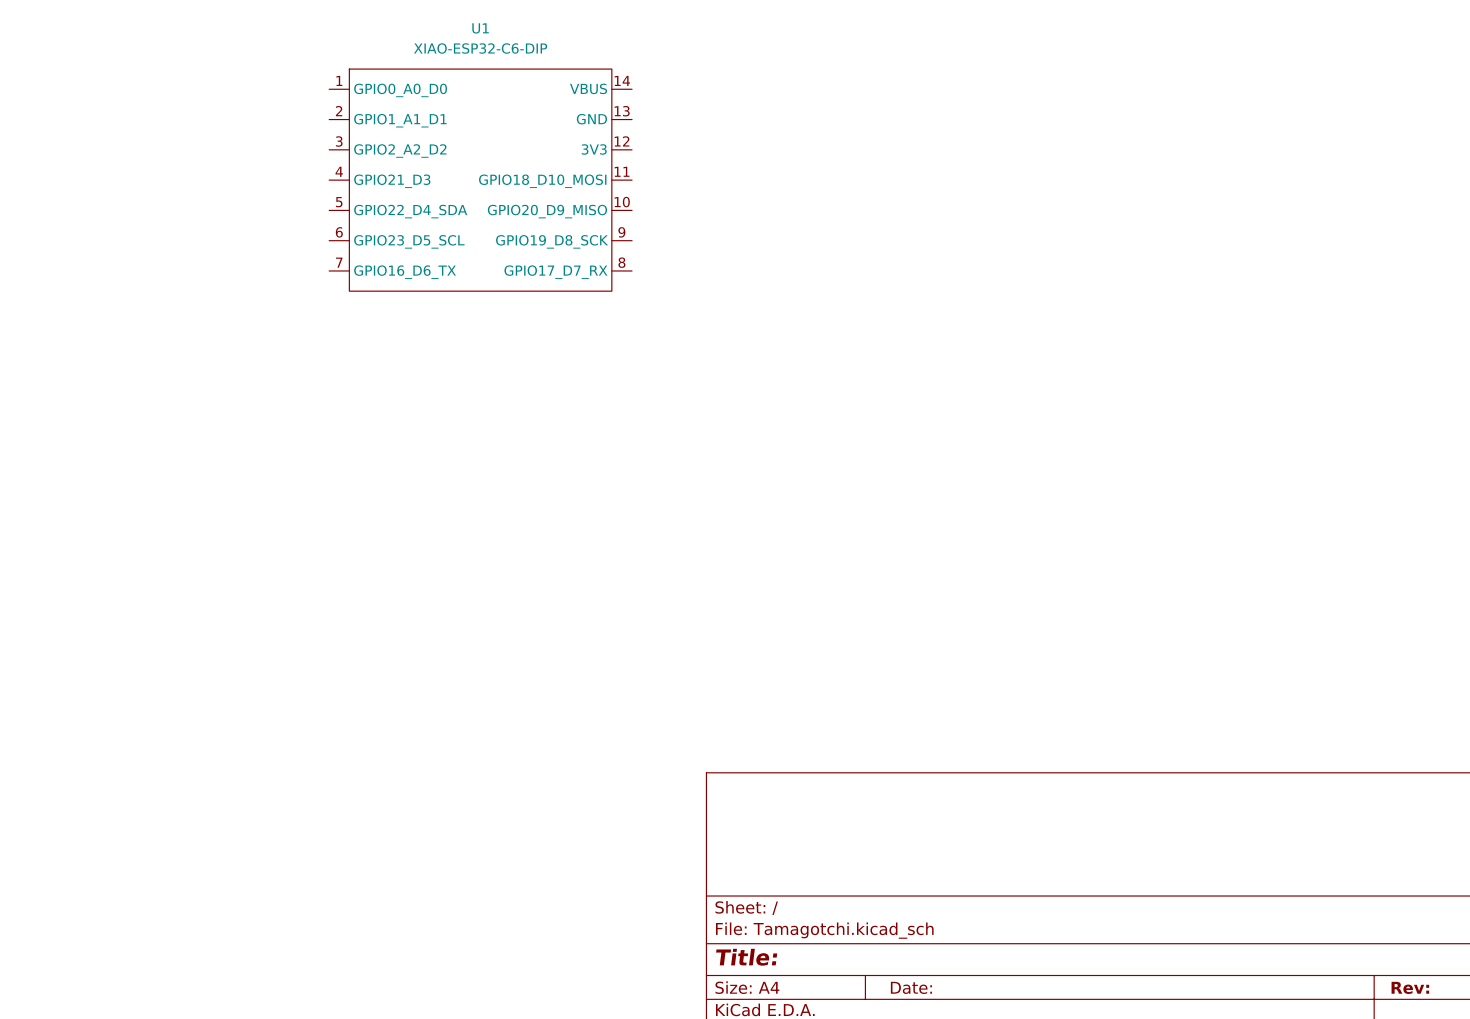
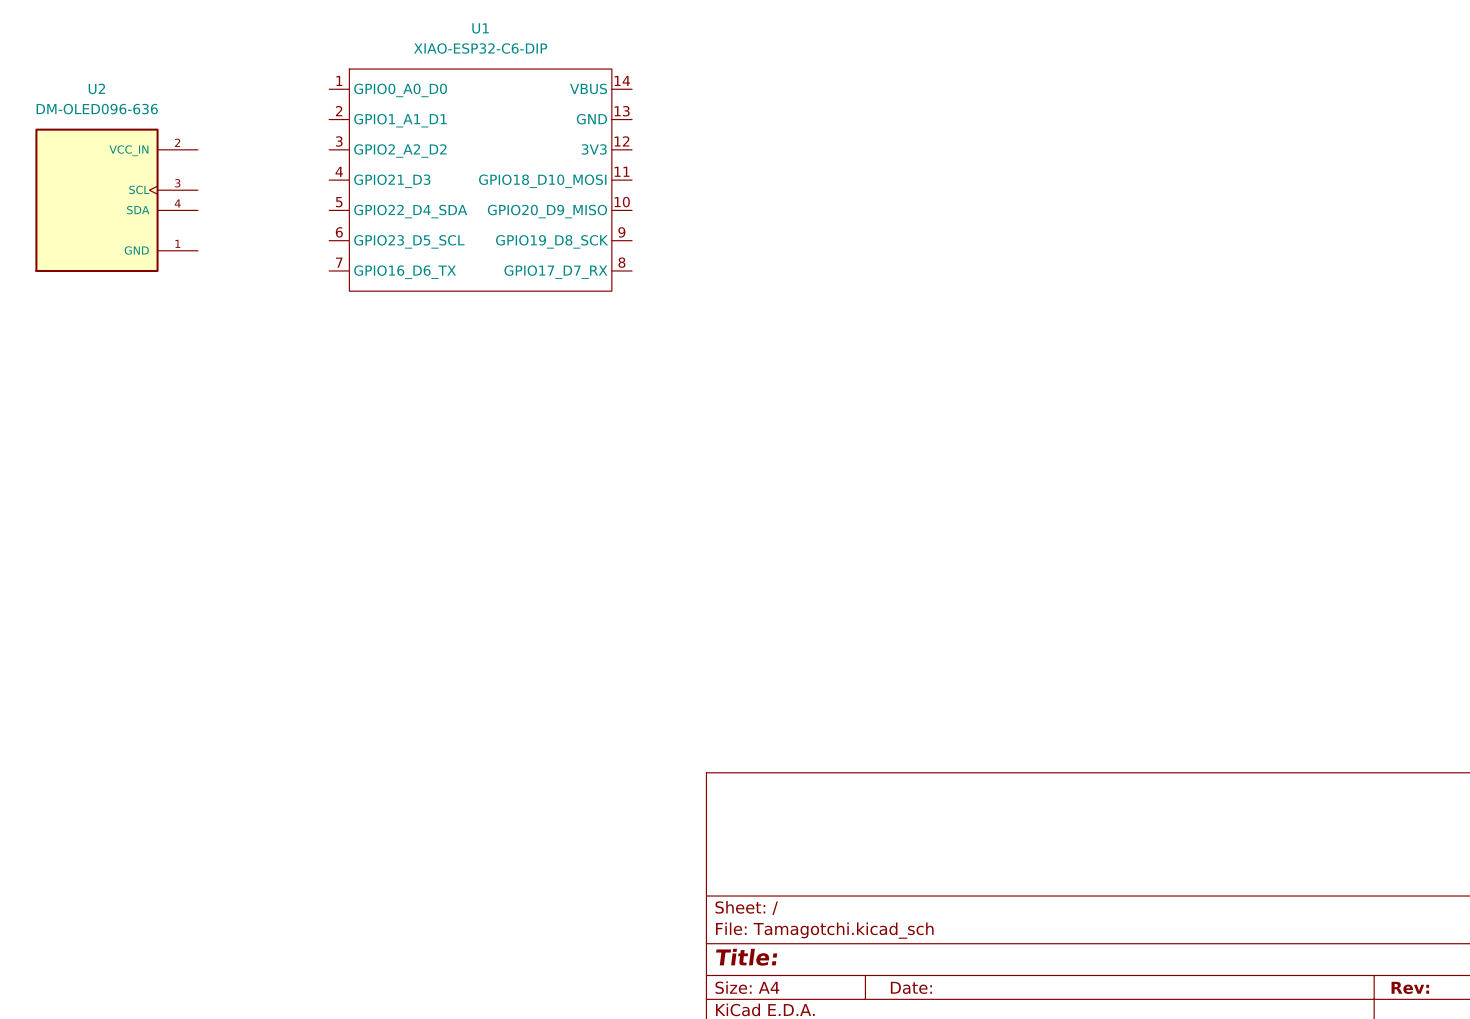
U2: none -> DM-OLED096-636 (116, 200)

